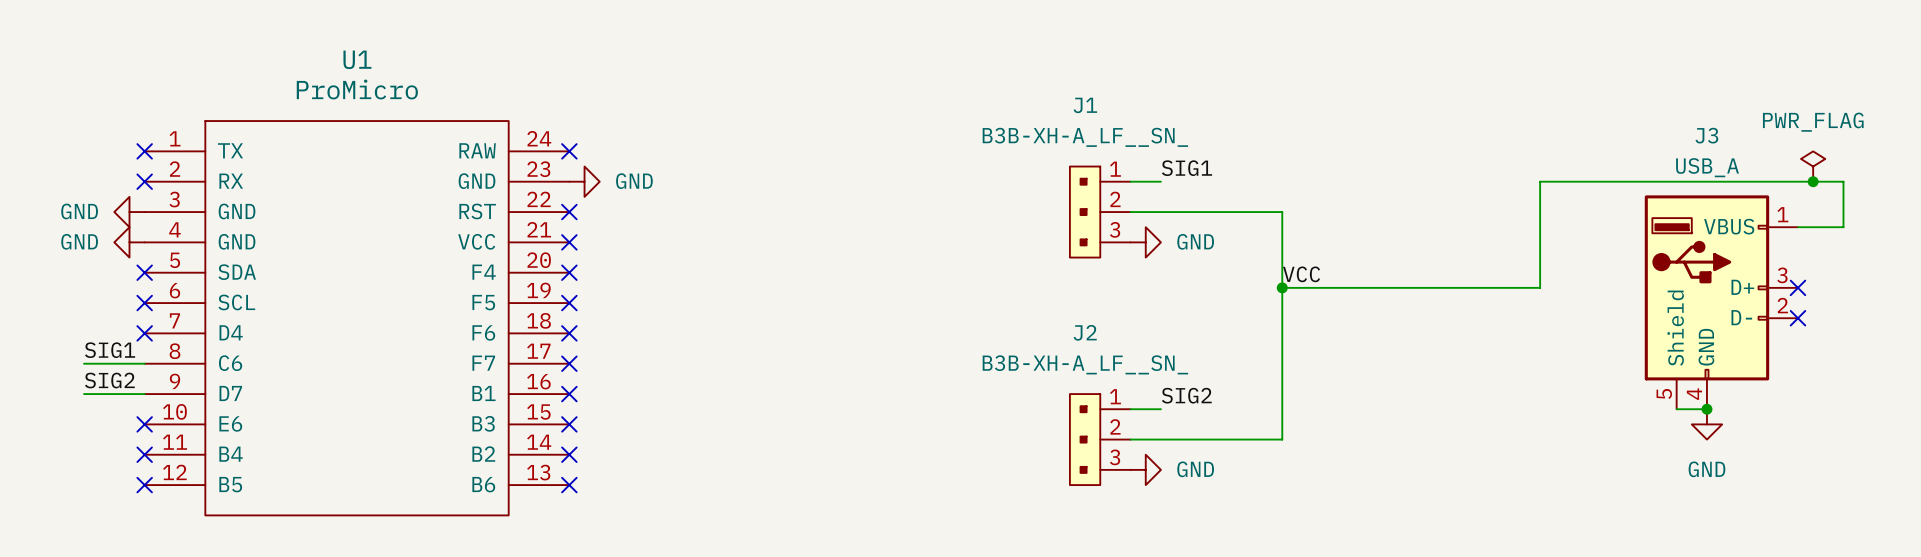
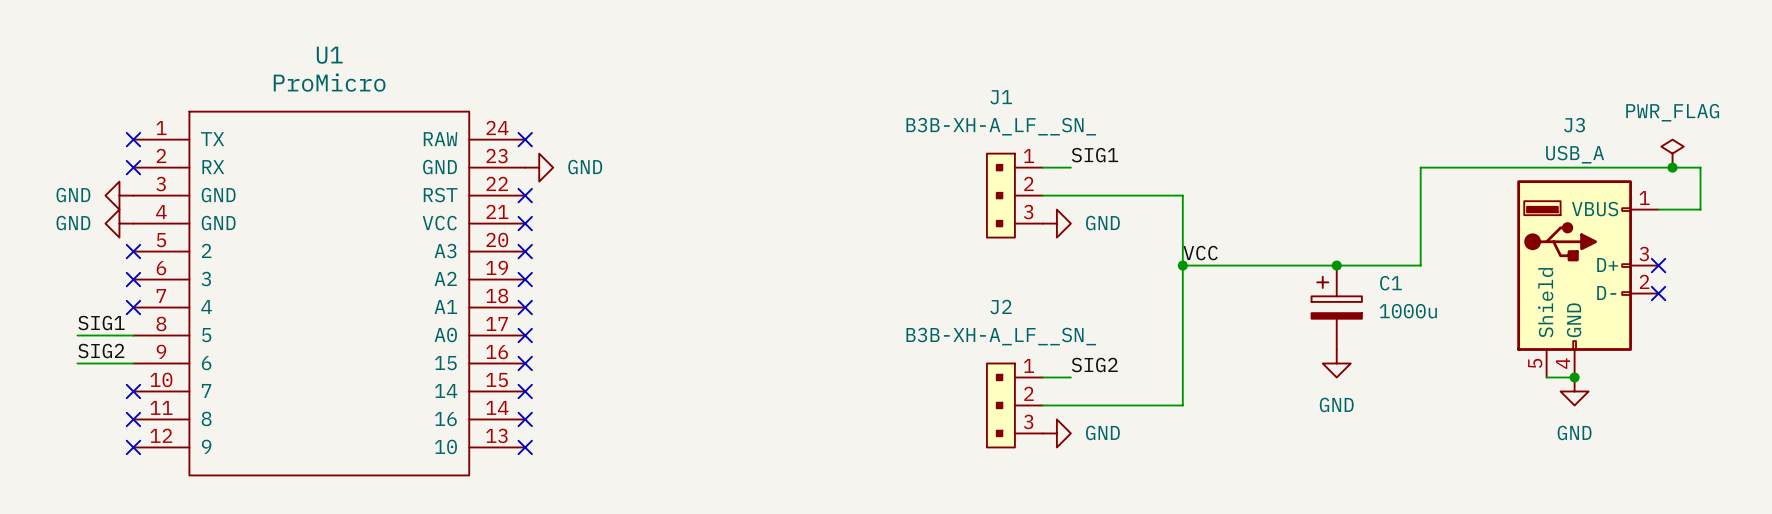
U1 symbol: [144, 121, 570, 516] -> [133, 111, 526, 476]
junction: none -> (1336, 265)
C1: none -> 1000u (1336, 307)
power symbol: none -> GND (1336, 363)

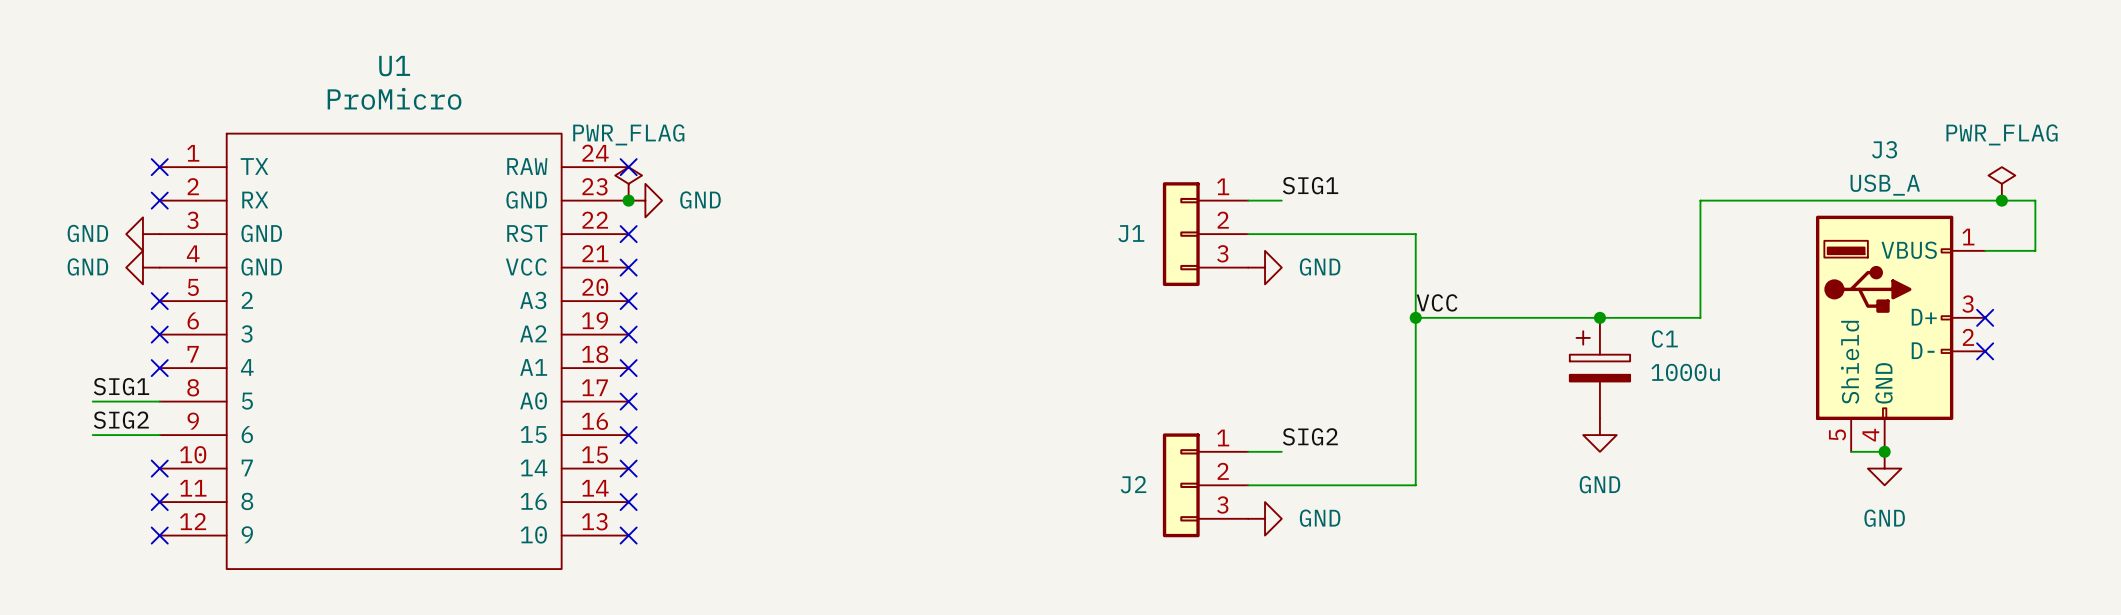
J1 name position: J1 (1001, 97) -> J1 (1131, 233)
J1 value: B3B-XH-A_LF__SN_ (1001, 126) -> none
power symbol: none -> PWR_FLAG (628, 183)
J1 symbol: [986, 153, 1043, 238] -> [1162, 182, 1249, 287]
junction: none -> (628, 200)
J2 name position: J2 (1001, 307) -> J2 (1133, 484)
J2 value: B3B-XH-A_LF__SN_ (1001, 336) -> none
J2 symbol: [986, 363, 1043, 448] -> [1162, 433, 1249, 538]

